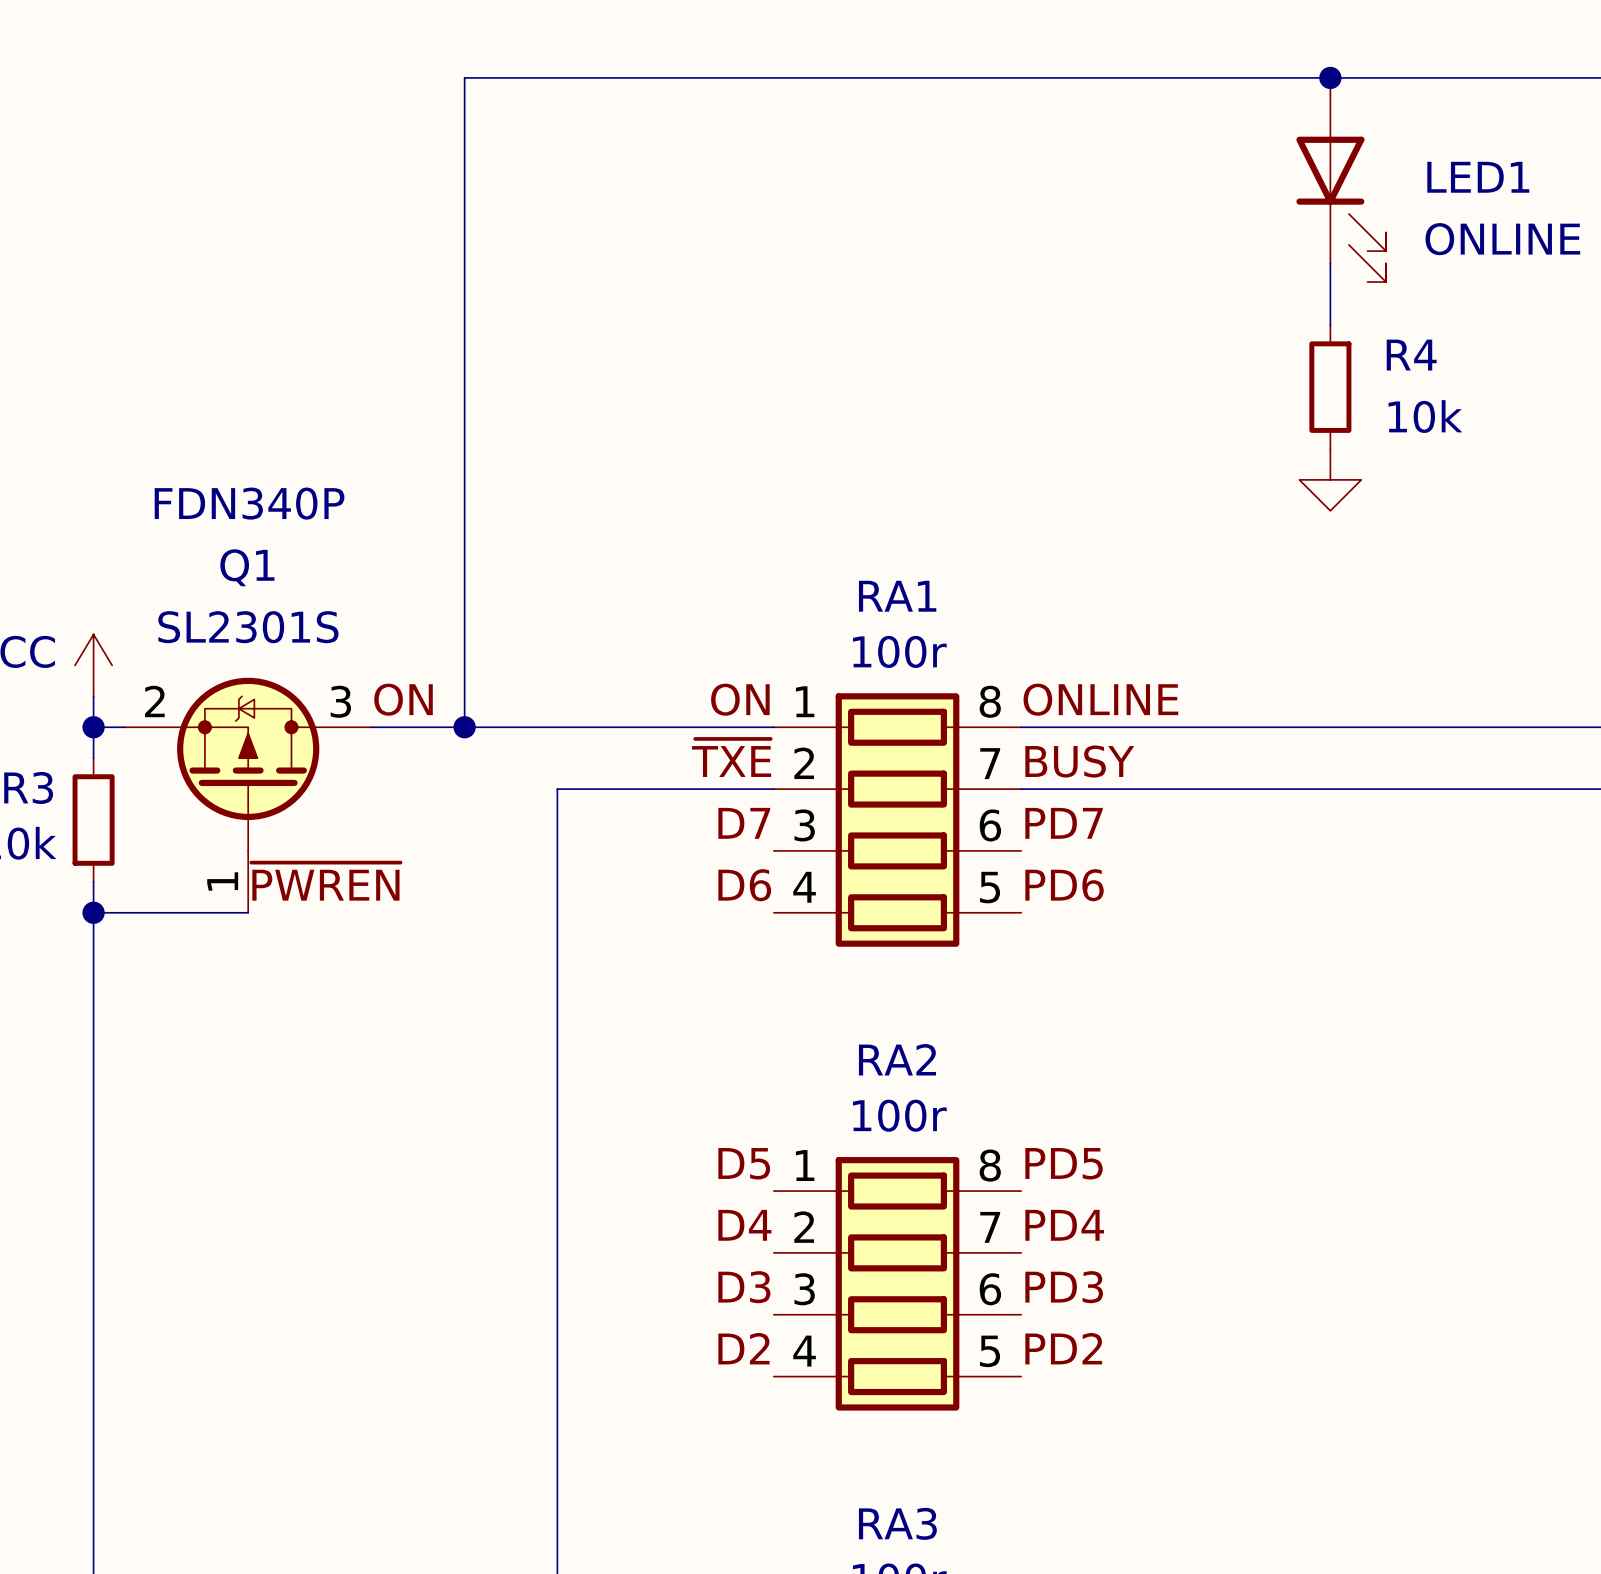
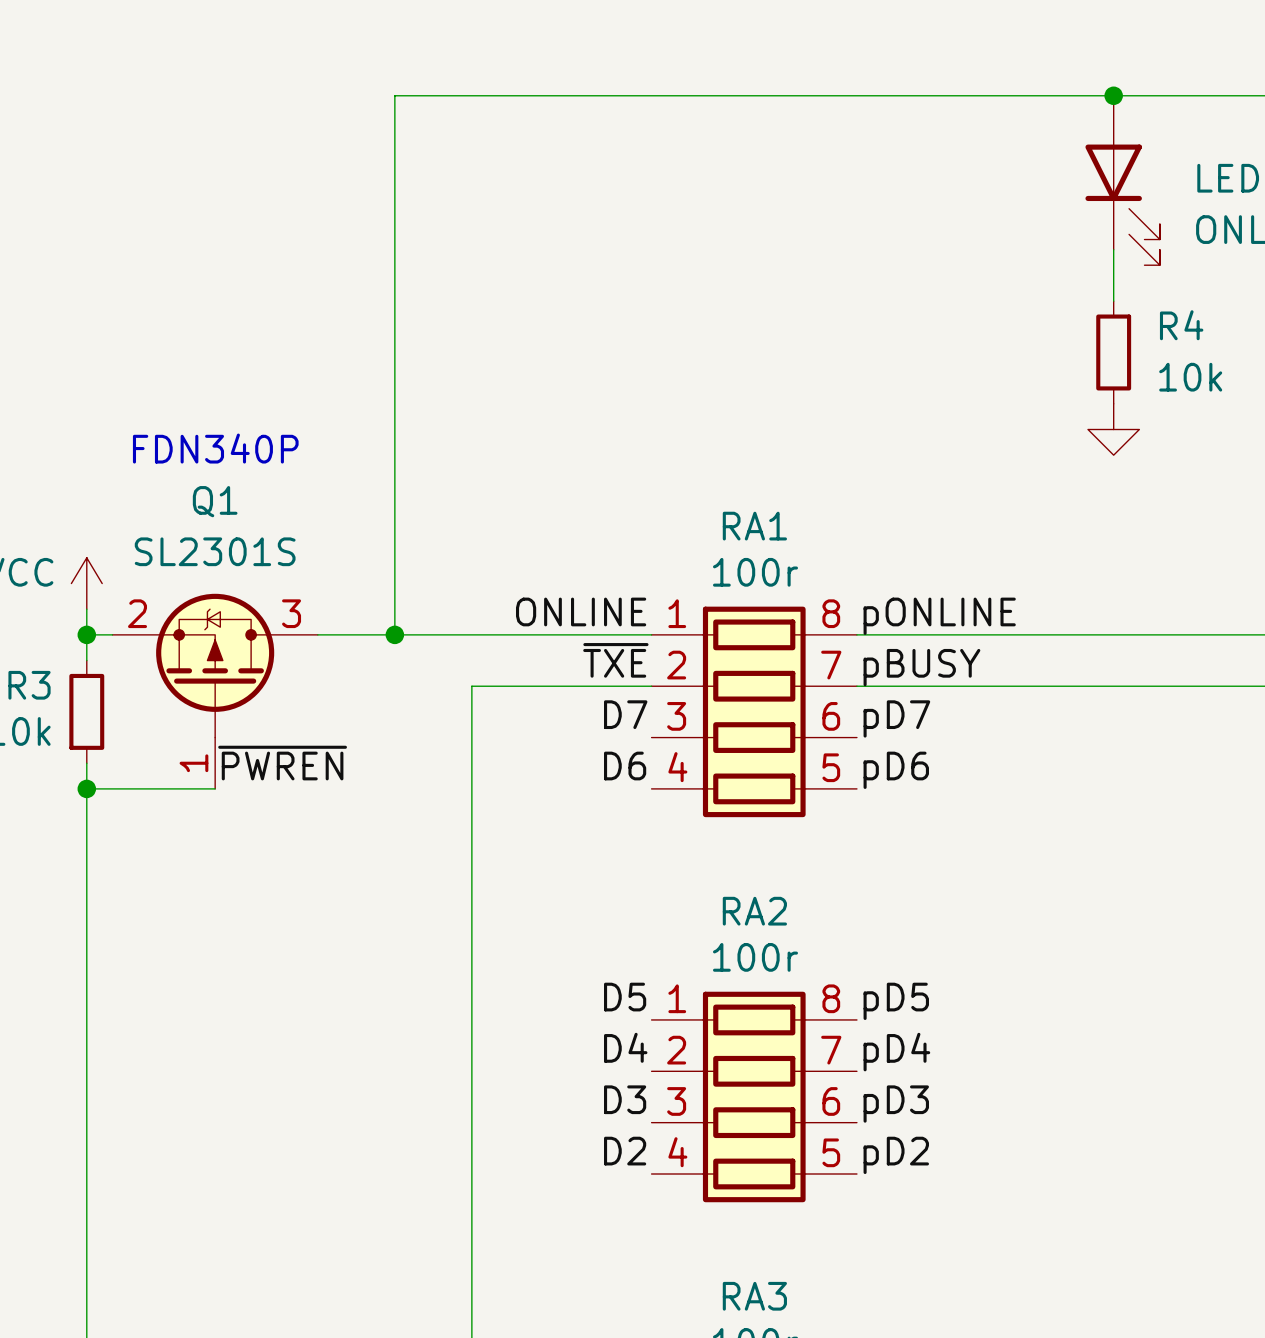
label: ON (403, 699) -> none
label: ON (740, 699) -> ONLINE (581, 611)
label: ONLINE (1100, 699) -> pONLINE (939, 616)
label: BUSY (1079, 761) -> pBUSY (921, 667)
label: PD7 (1064, 823) -> pD7 (896, 718)
label: PD6 (1064, 885) -> pD6 (896, 770)
label: PD5 (1064, 1163) -> pD5 (896, 1001)
label: PD4 (1064, 1225) -> pD4 (896, 1052)
label: PD3 (1064, 1287) -> pD3 (896, 1104)
label: PD2 (1063, 1348) -> pD2 (896, 1155)

